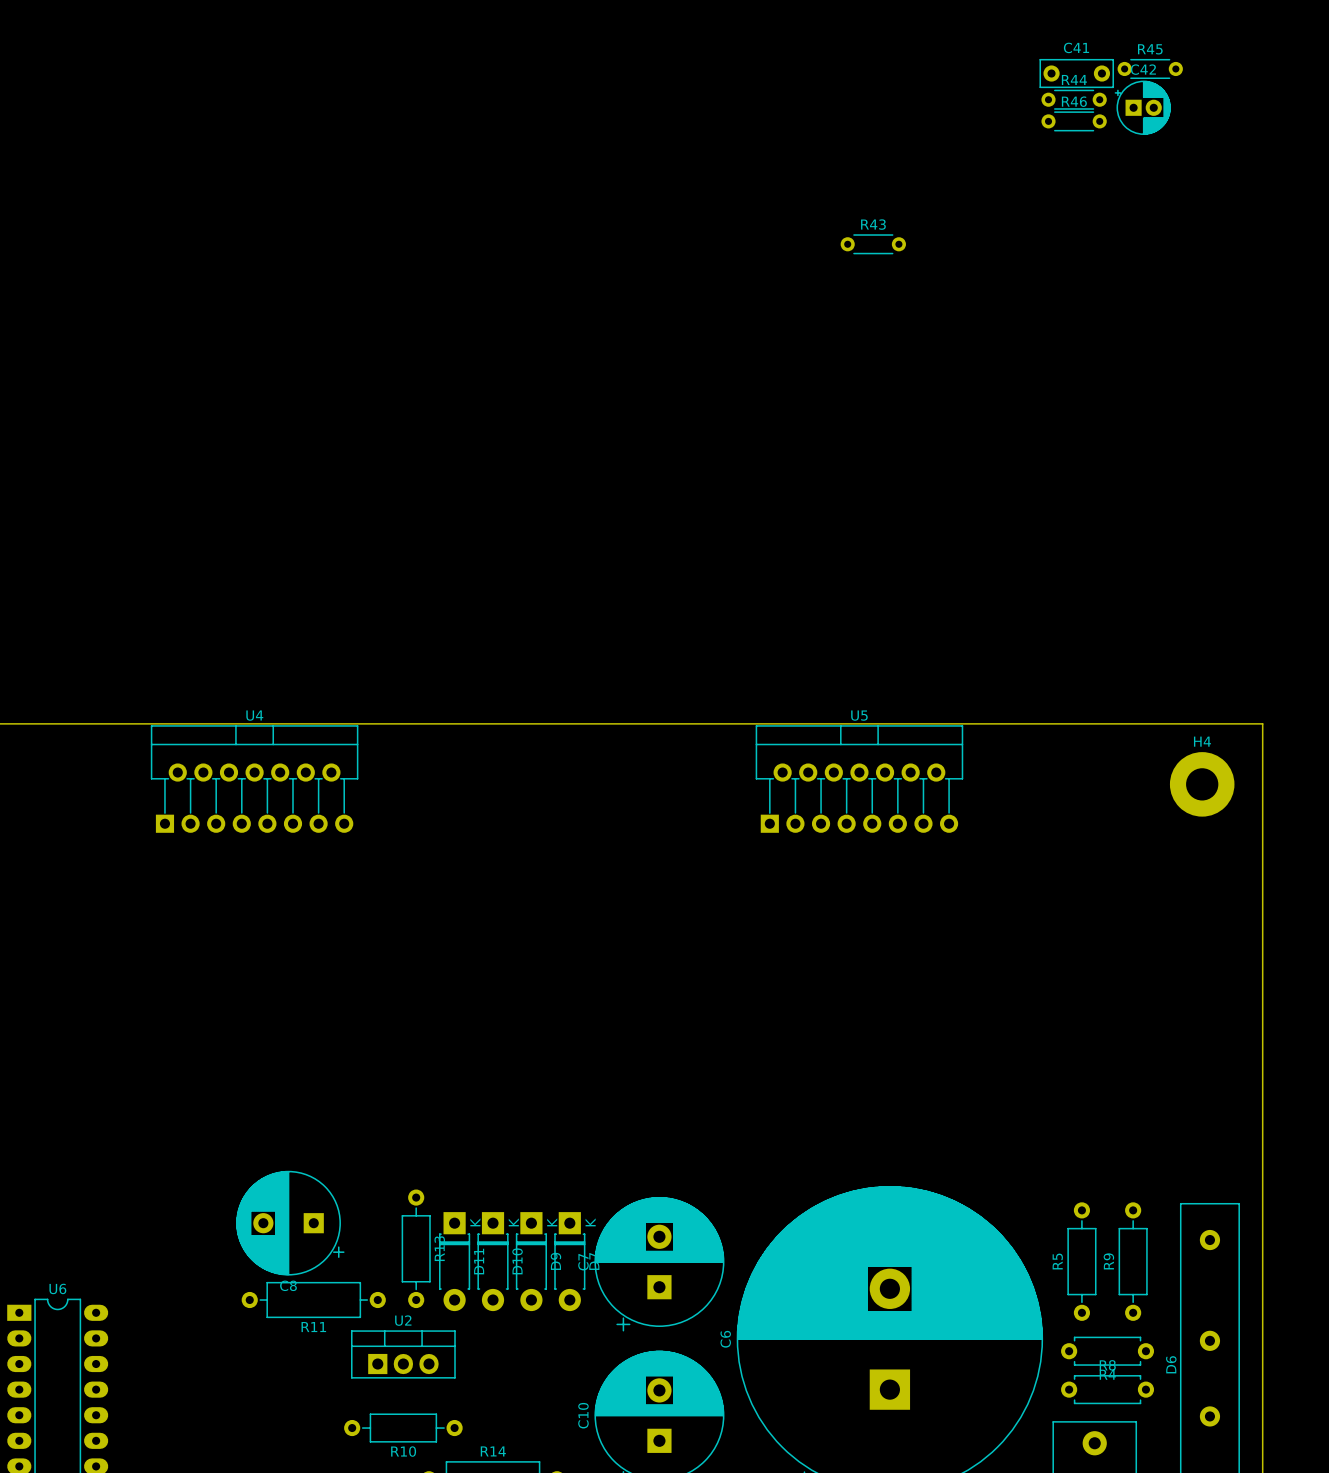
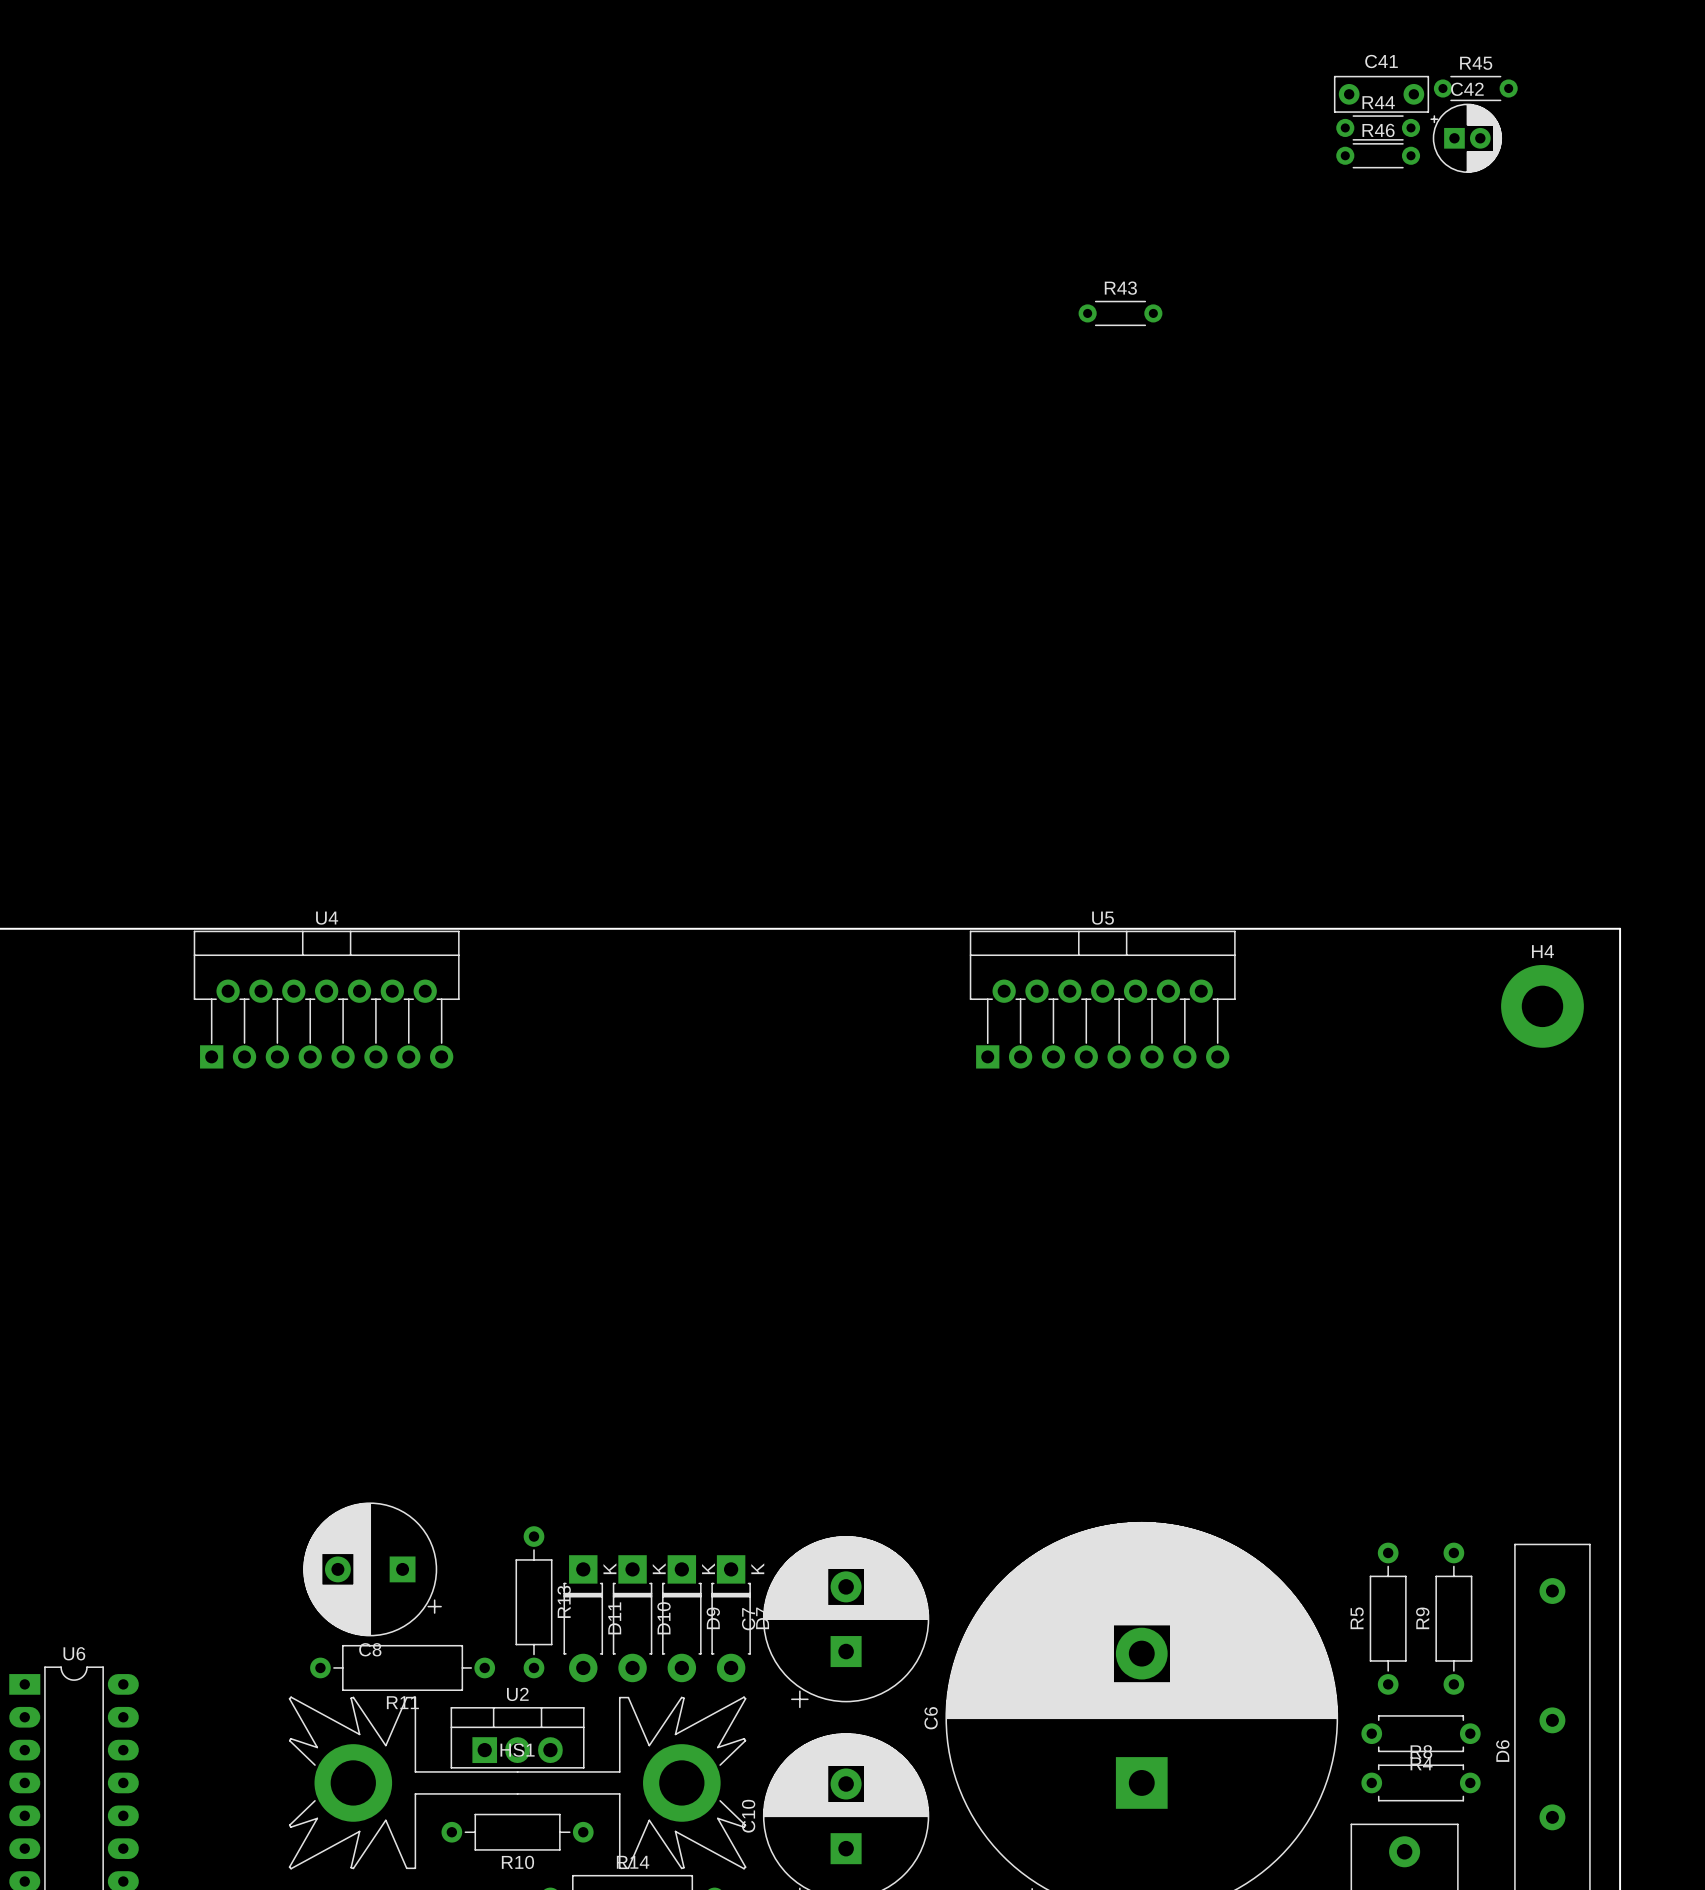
HS1: none -> (517, 1782)

